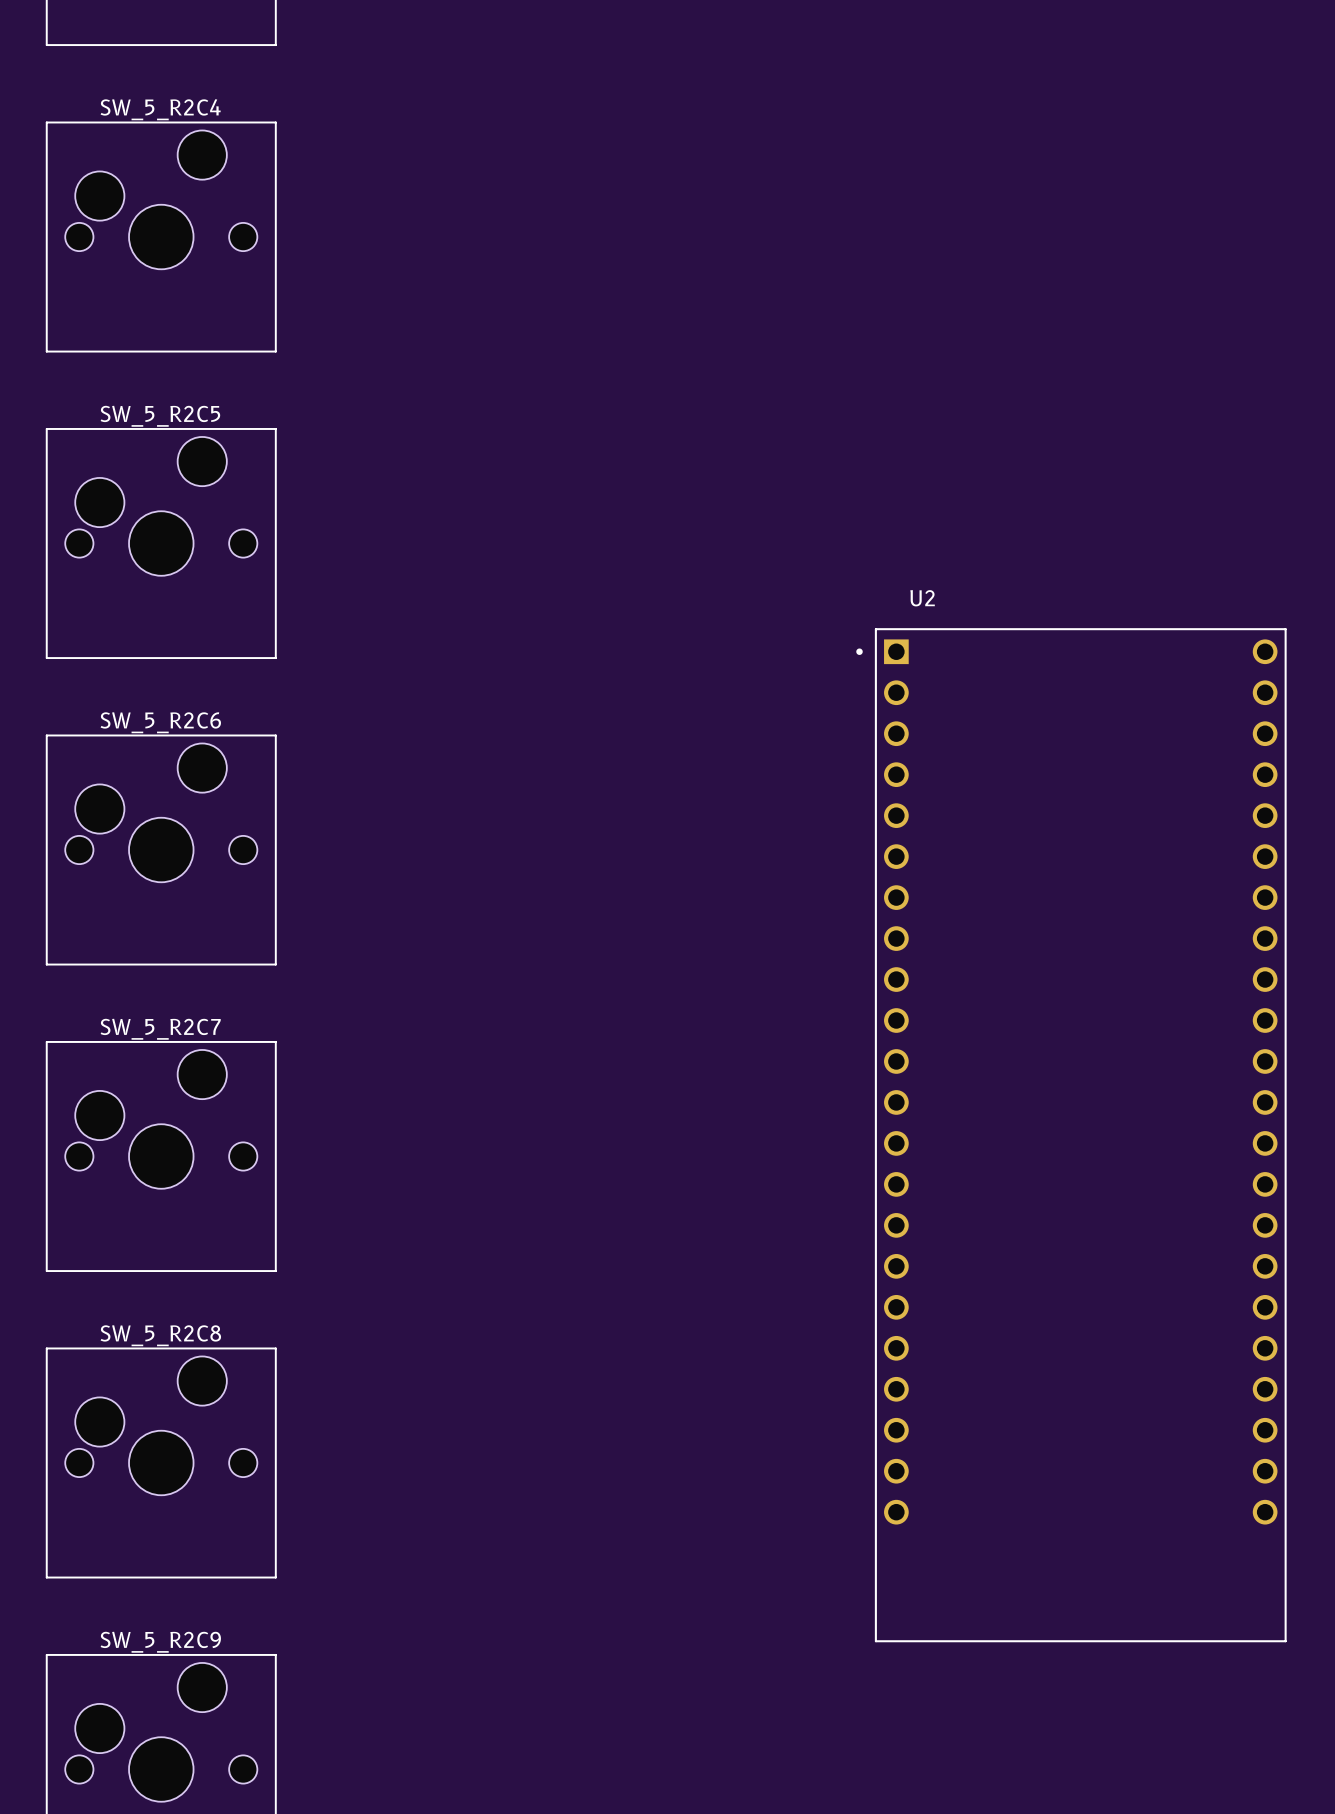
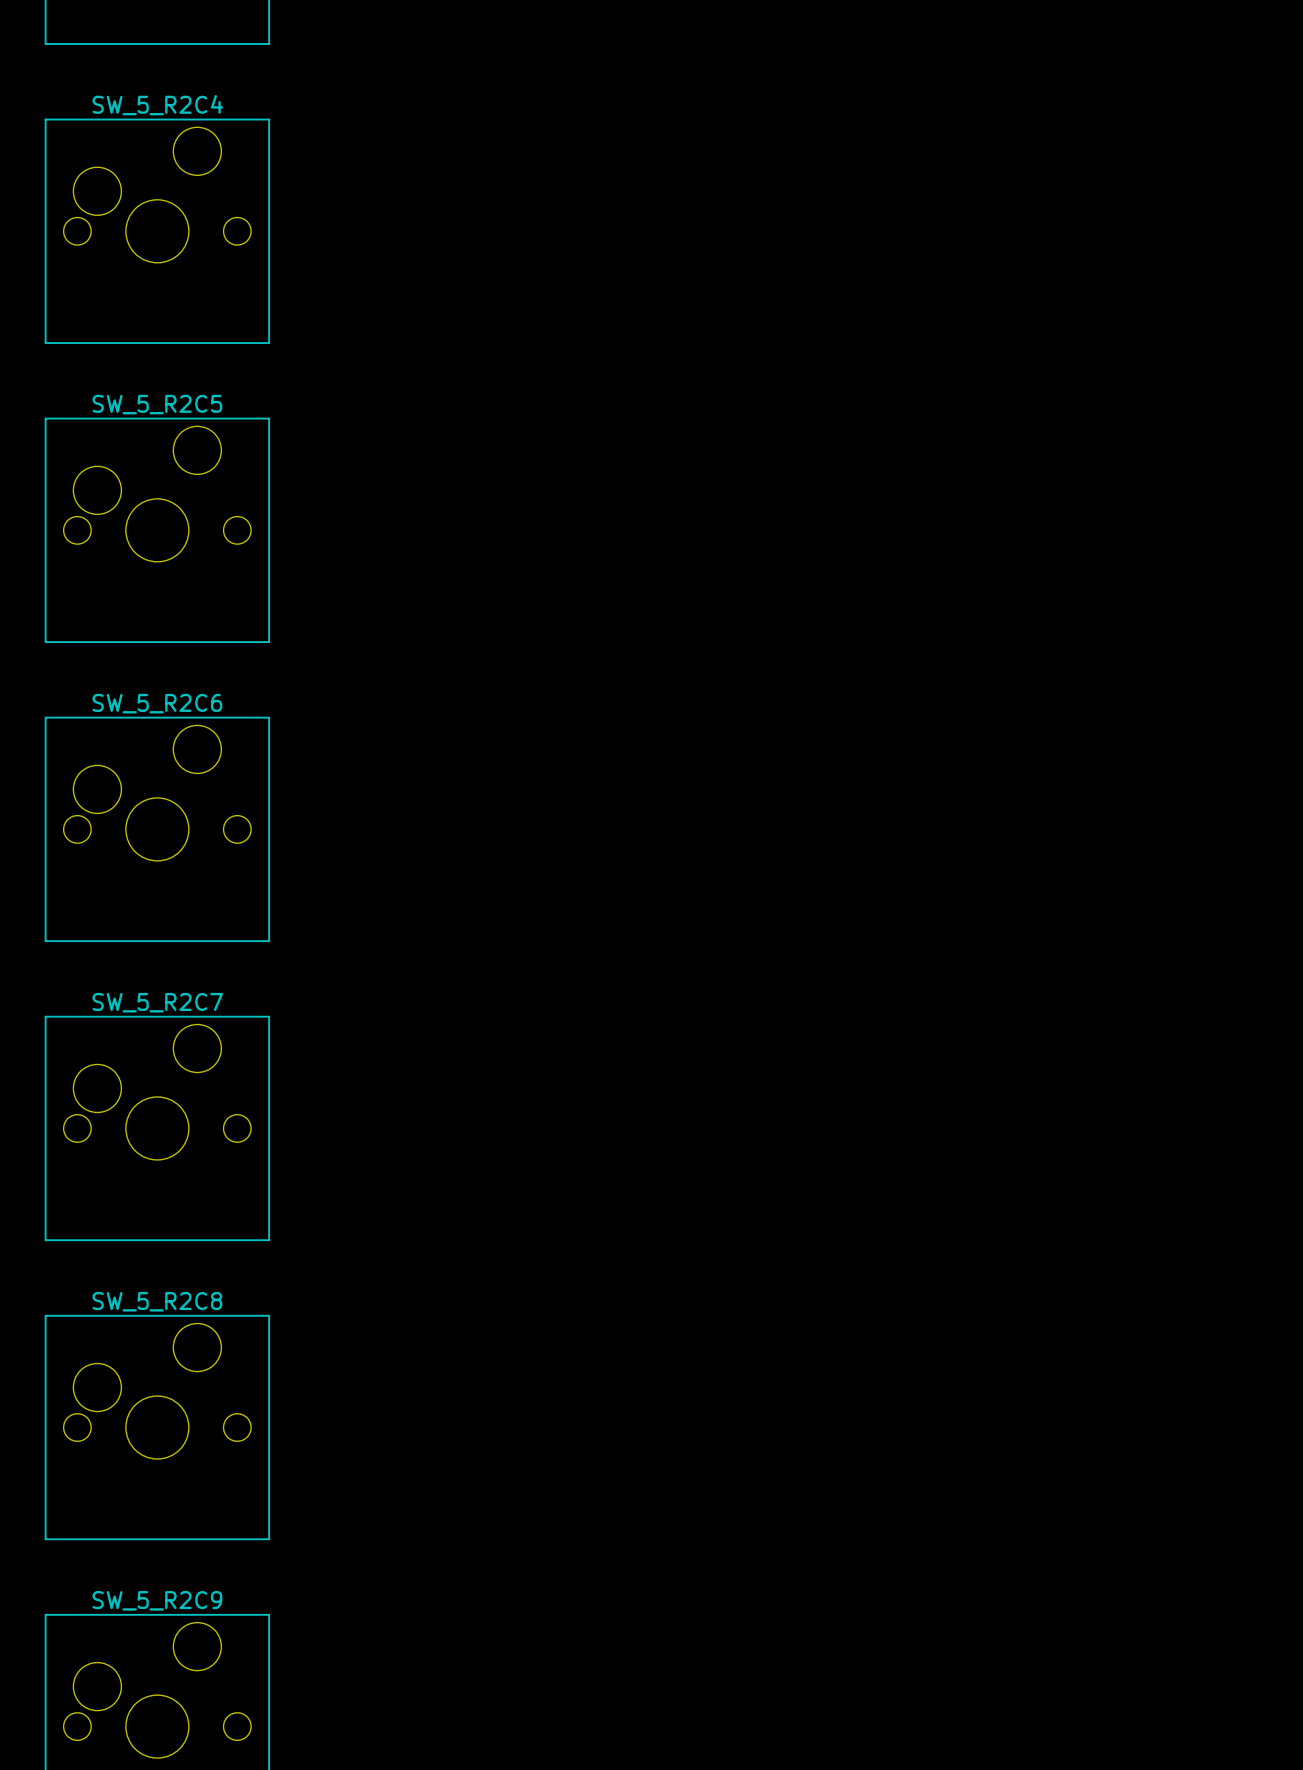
U2: (1071, 1135) -> none

